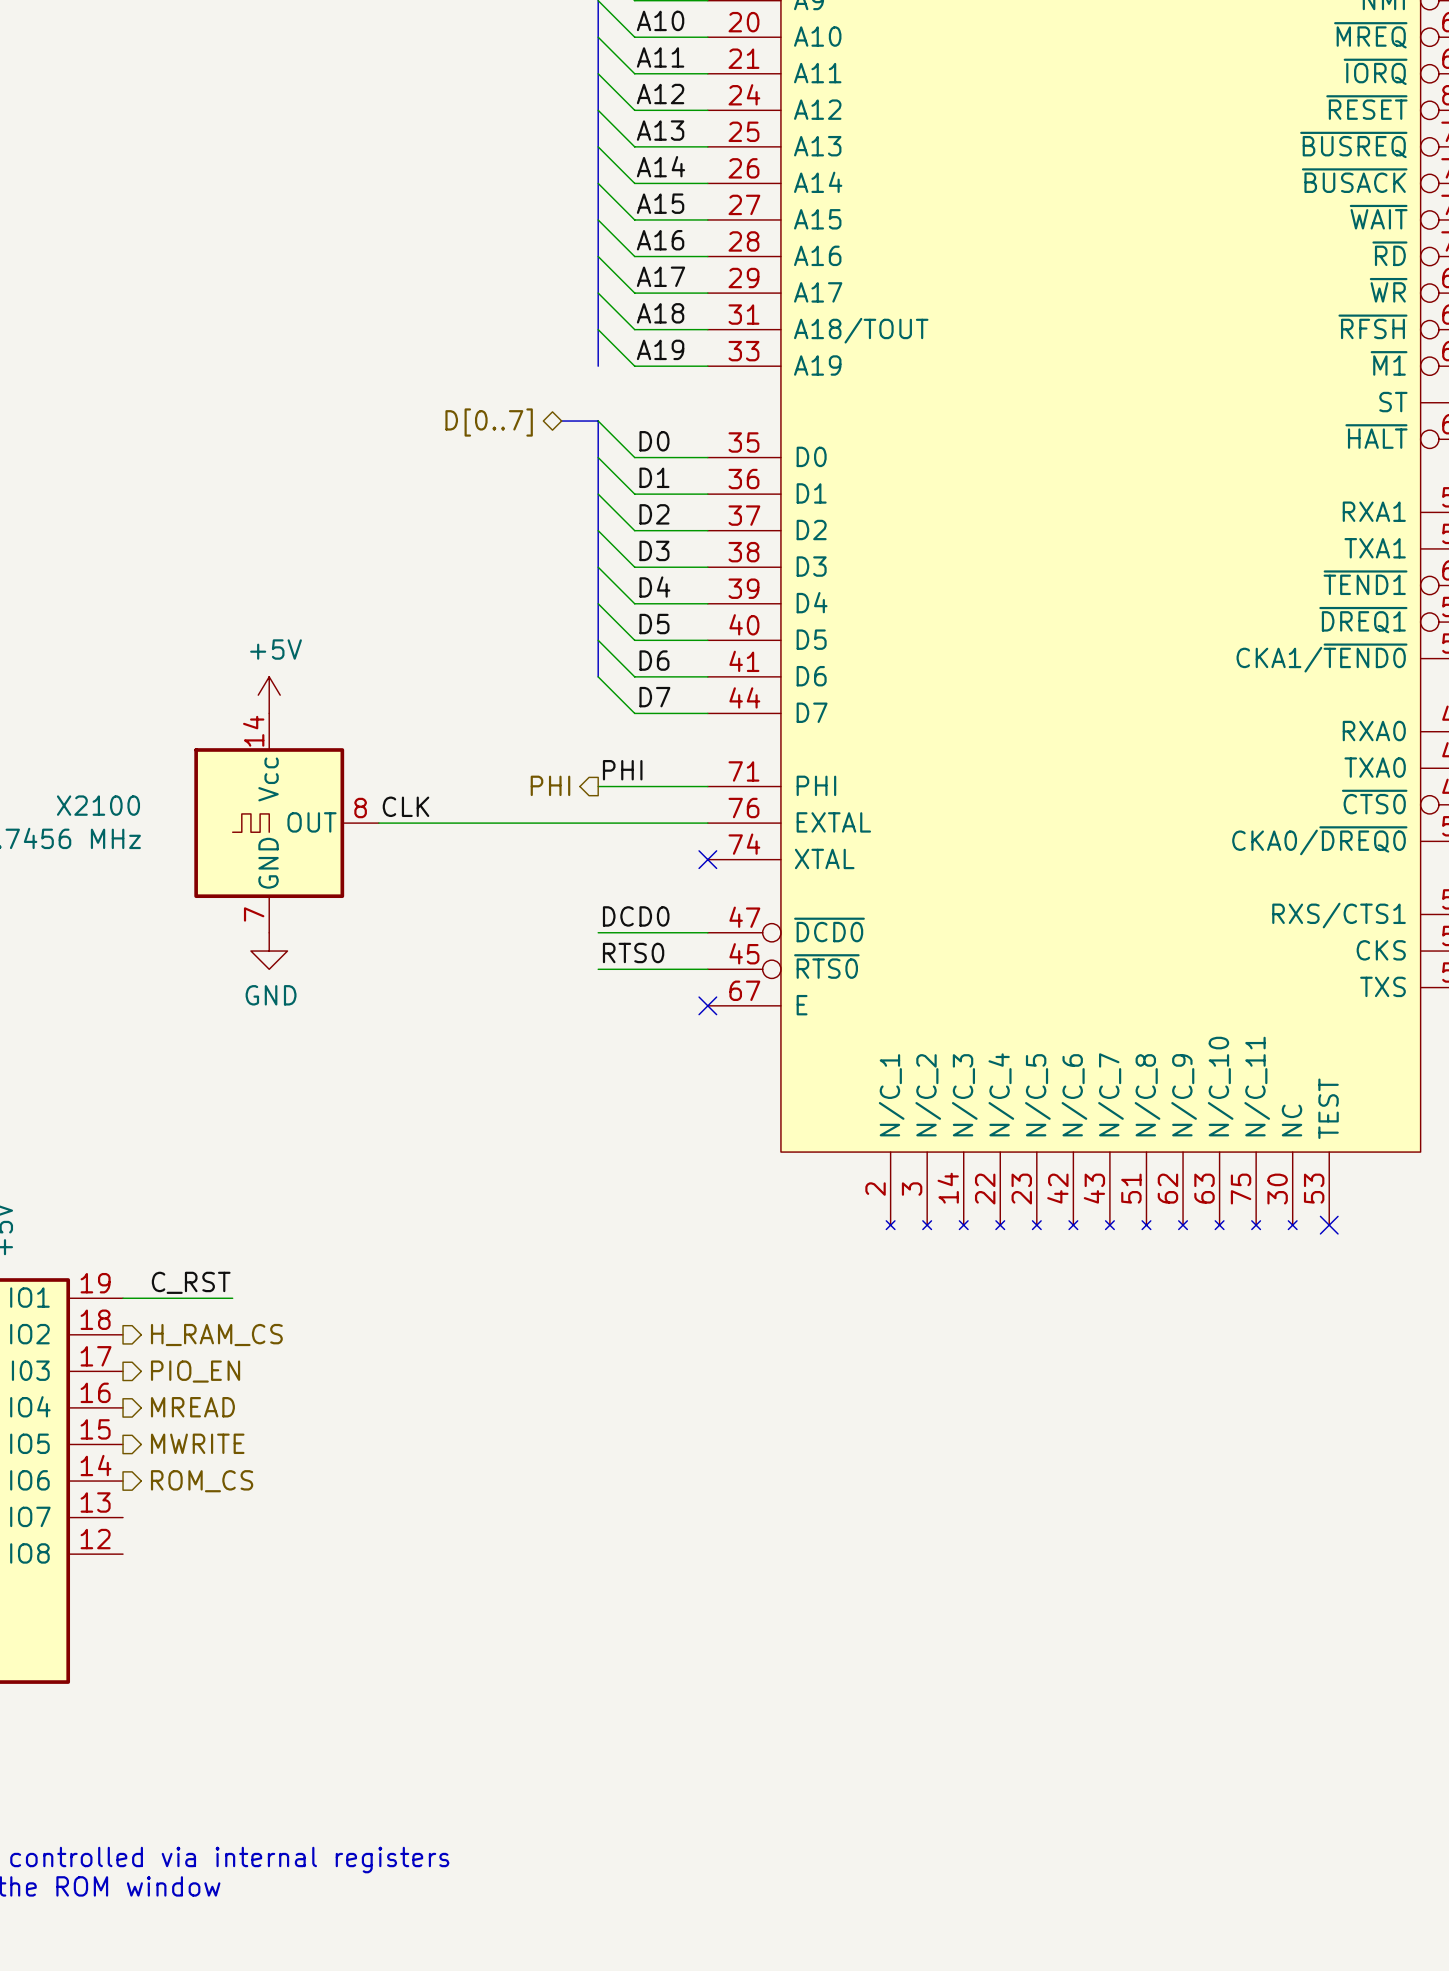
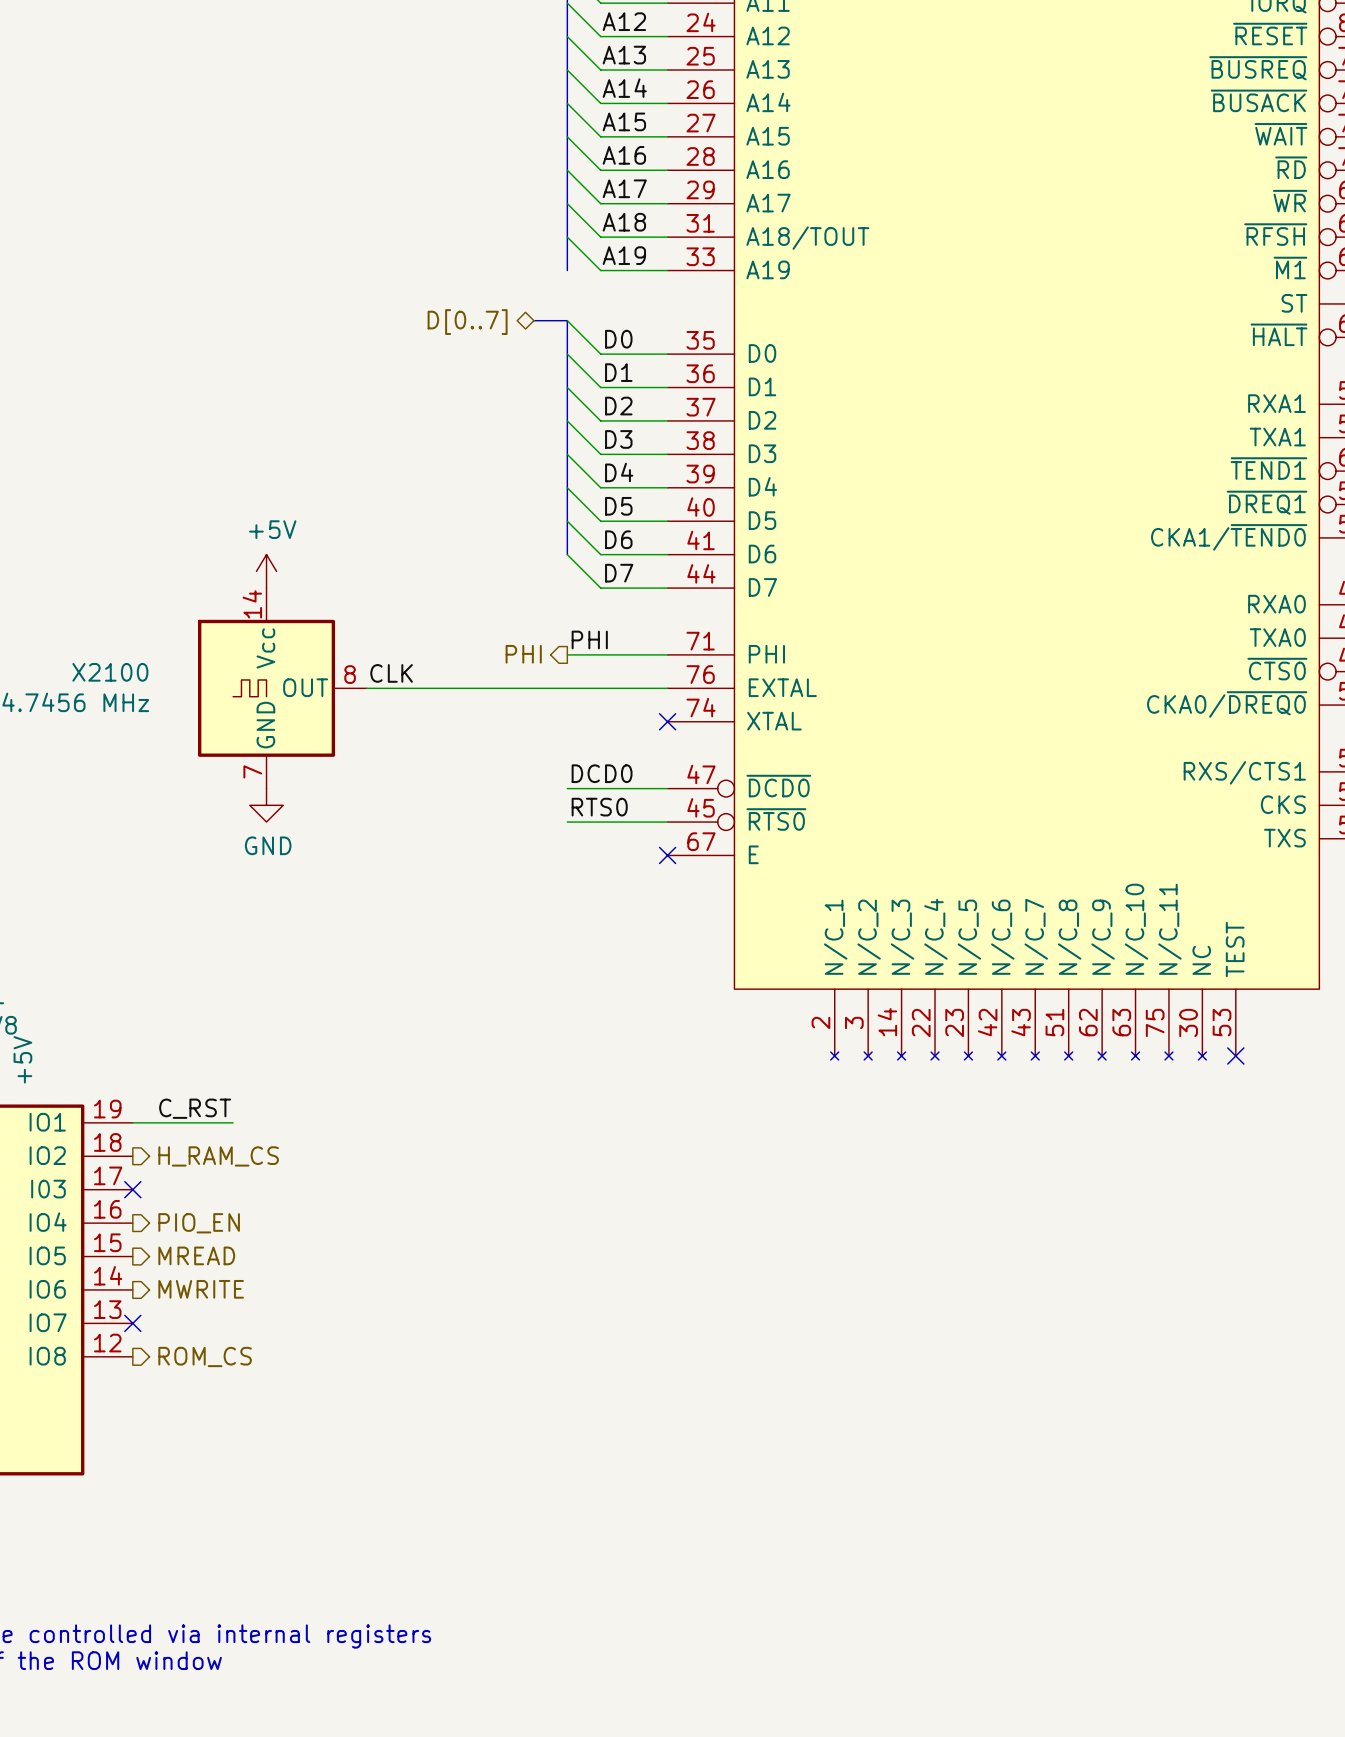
no-connect mark: none -> (132, 1189)
hierarchical label: PIO_EN (195, 1371) -> none
hierarchical label: MREAD (192, 1407) -> PIO_EN (199, 1223)
hierarchical label: MWRITE (197, 1443) -> MREAD (196, 1255)
hierarchical label: ROM_CS (202, 1481) -> MWRITE (201, 1289)
no-connect mark: none -> (132, 1323)
hierarchical label: none -> ROM_CS (205, 1356)

